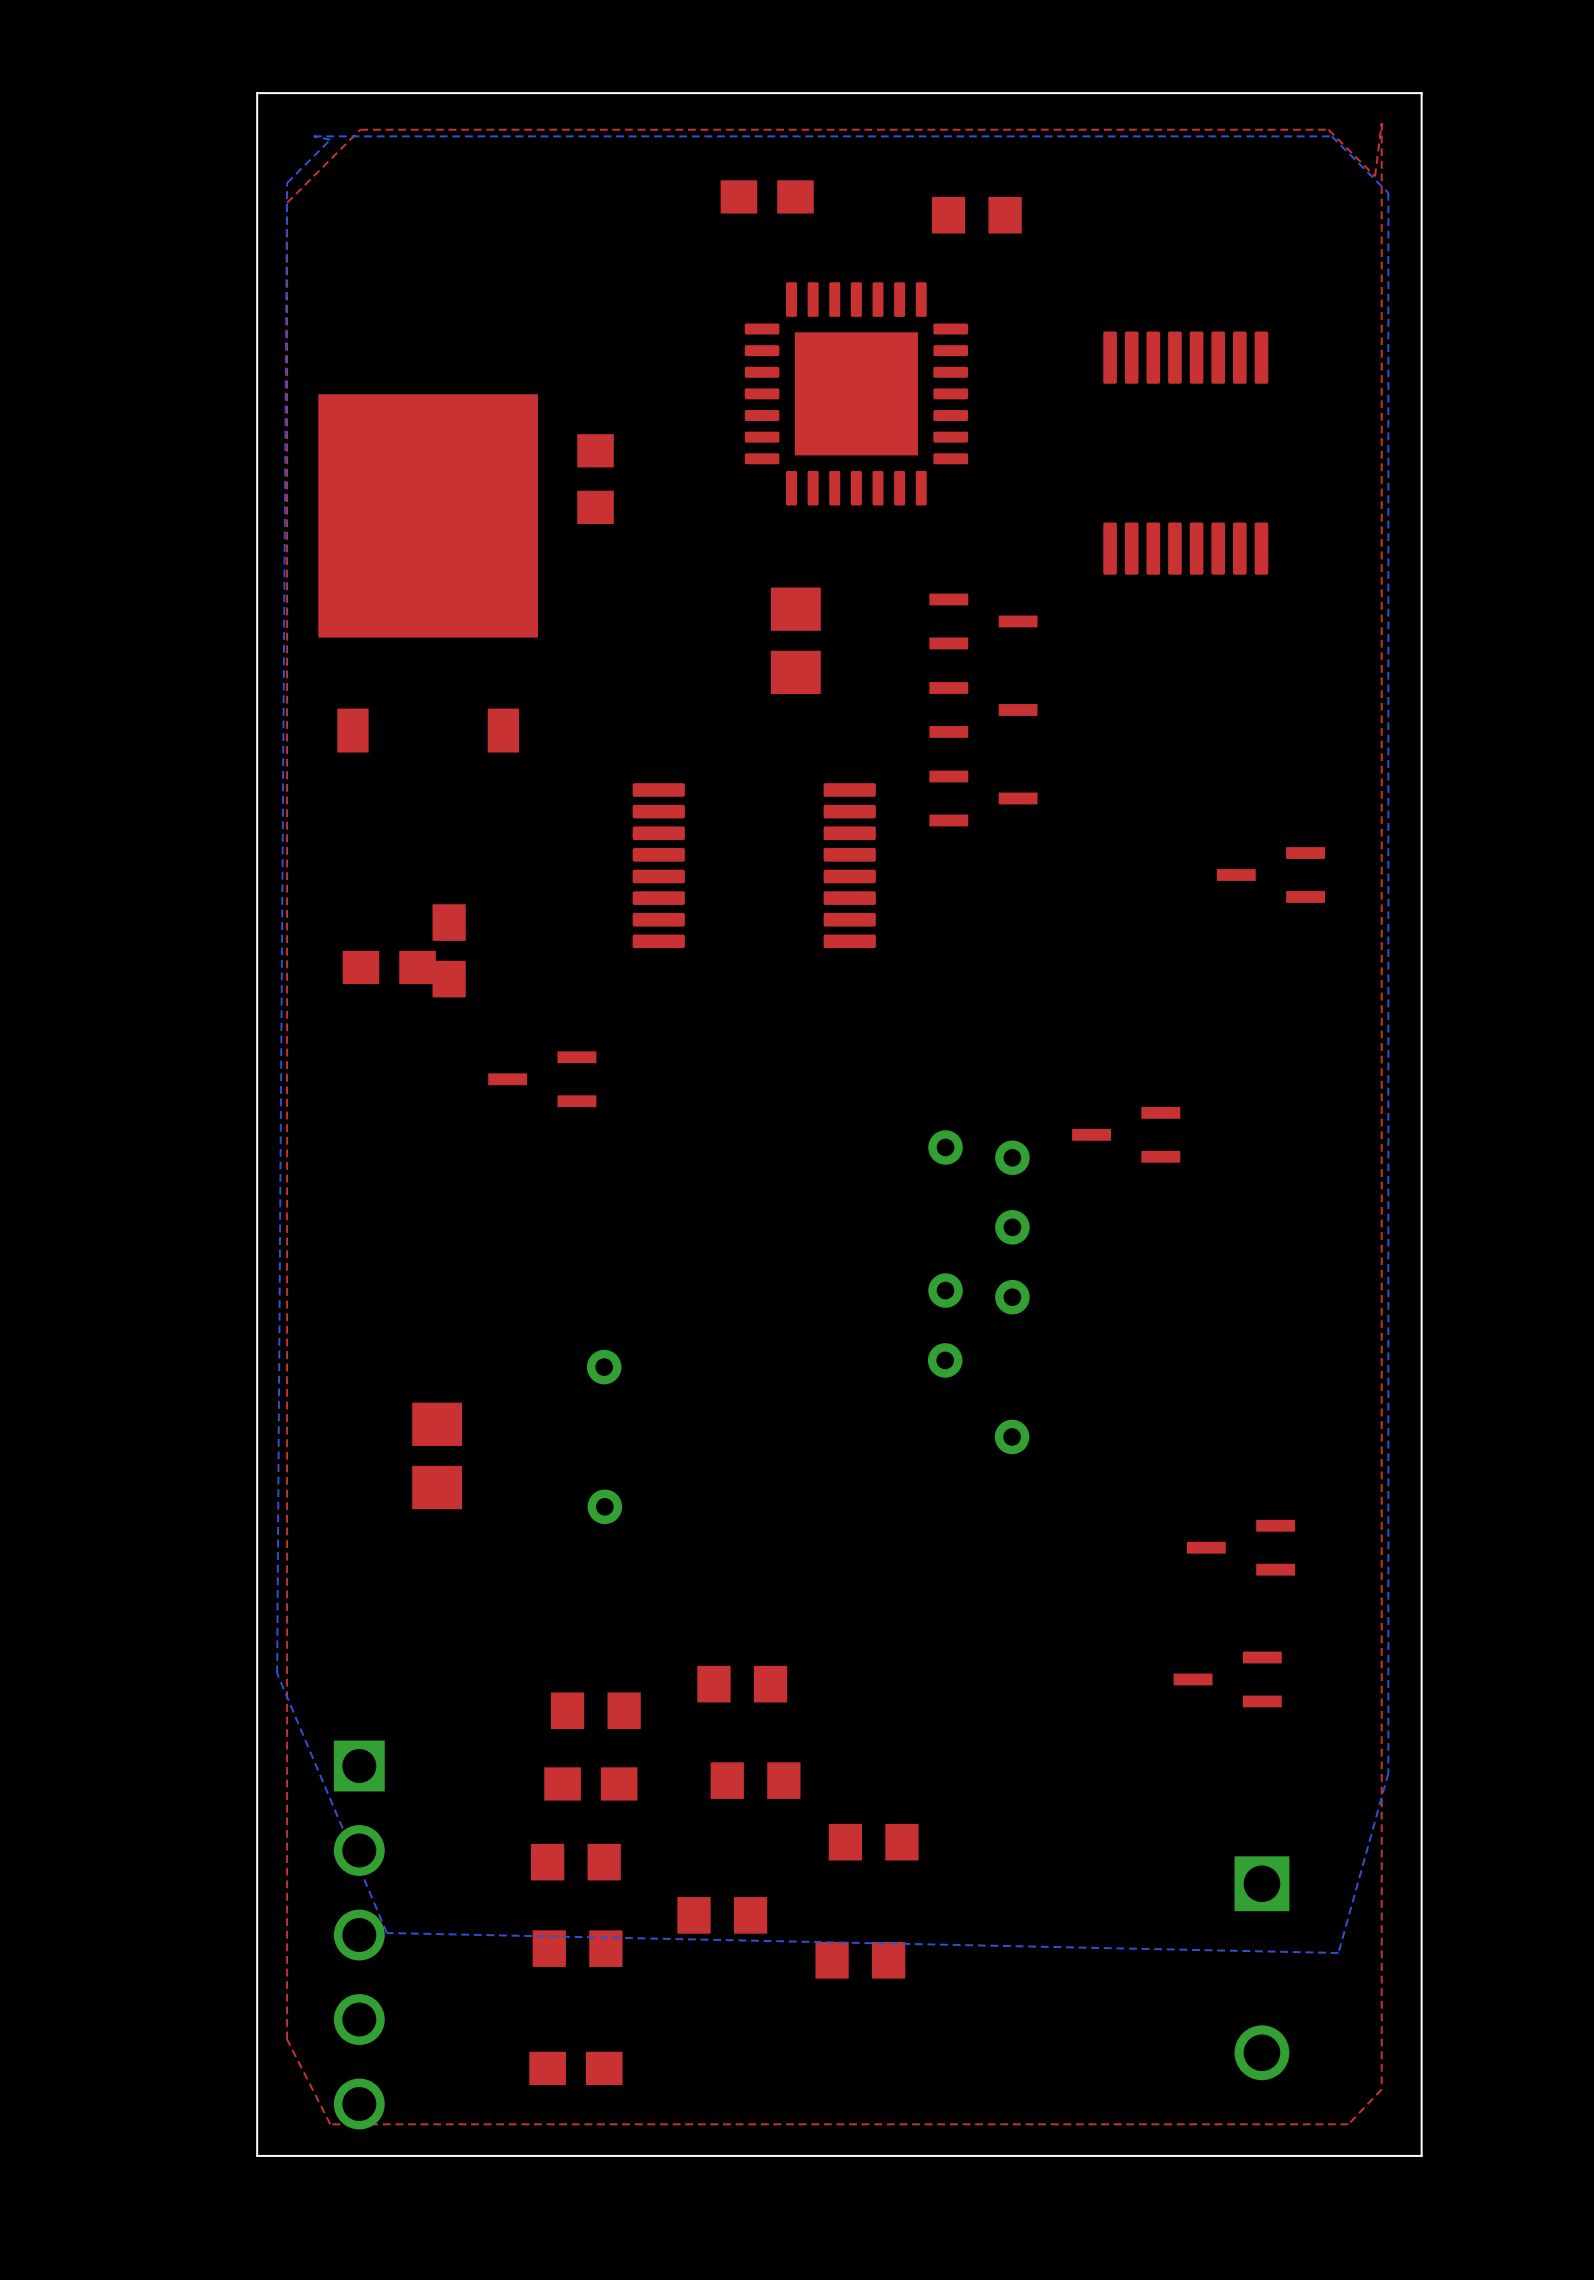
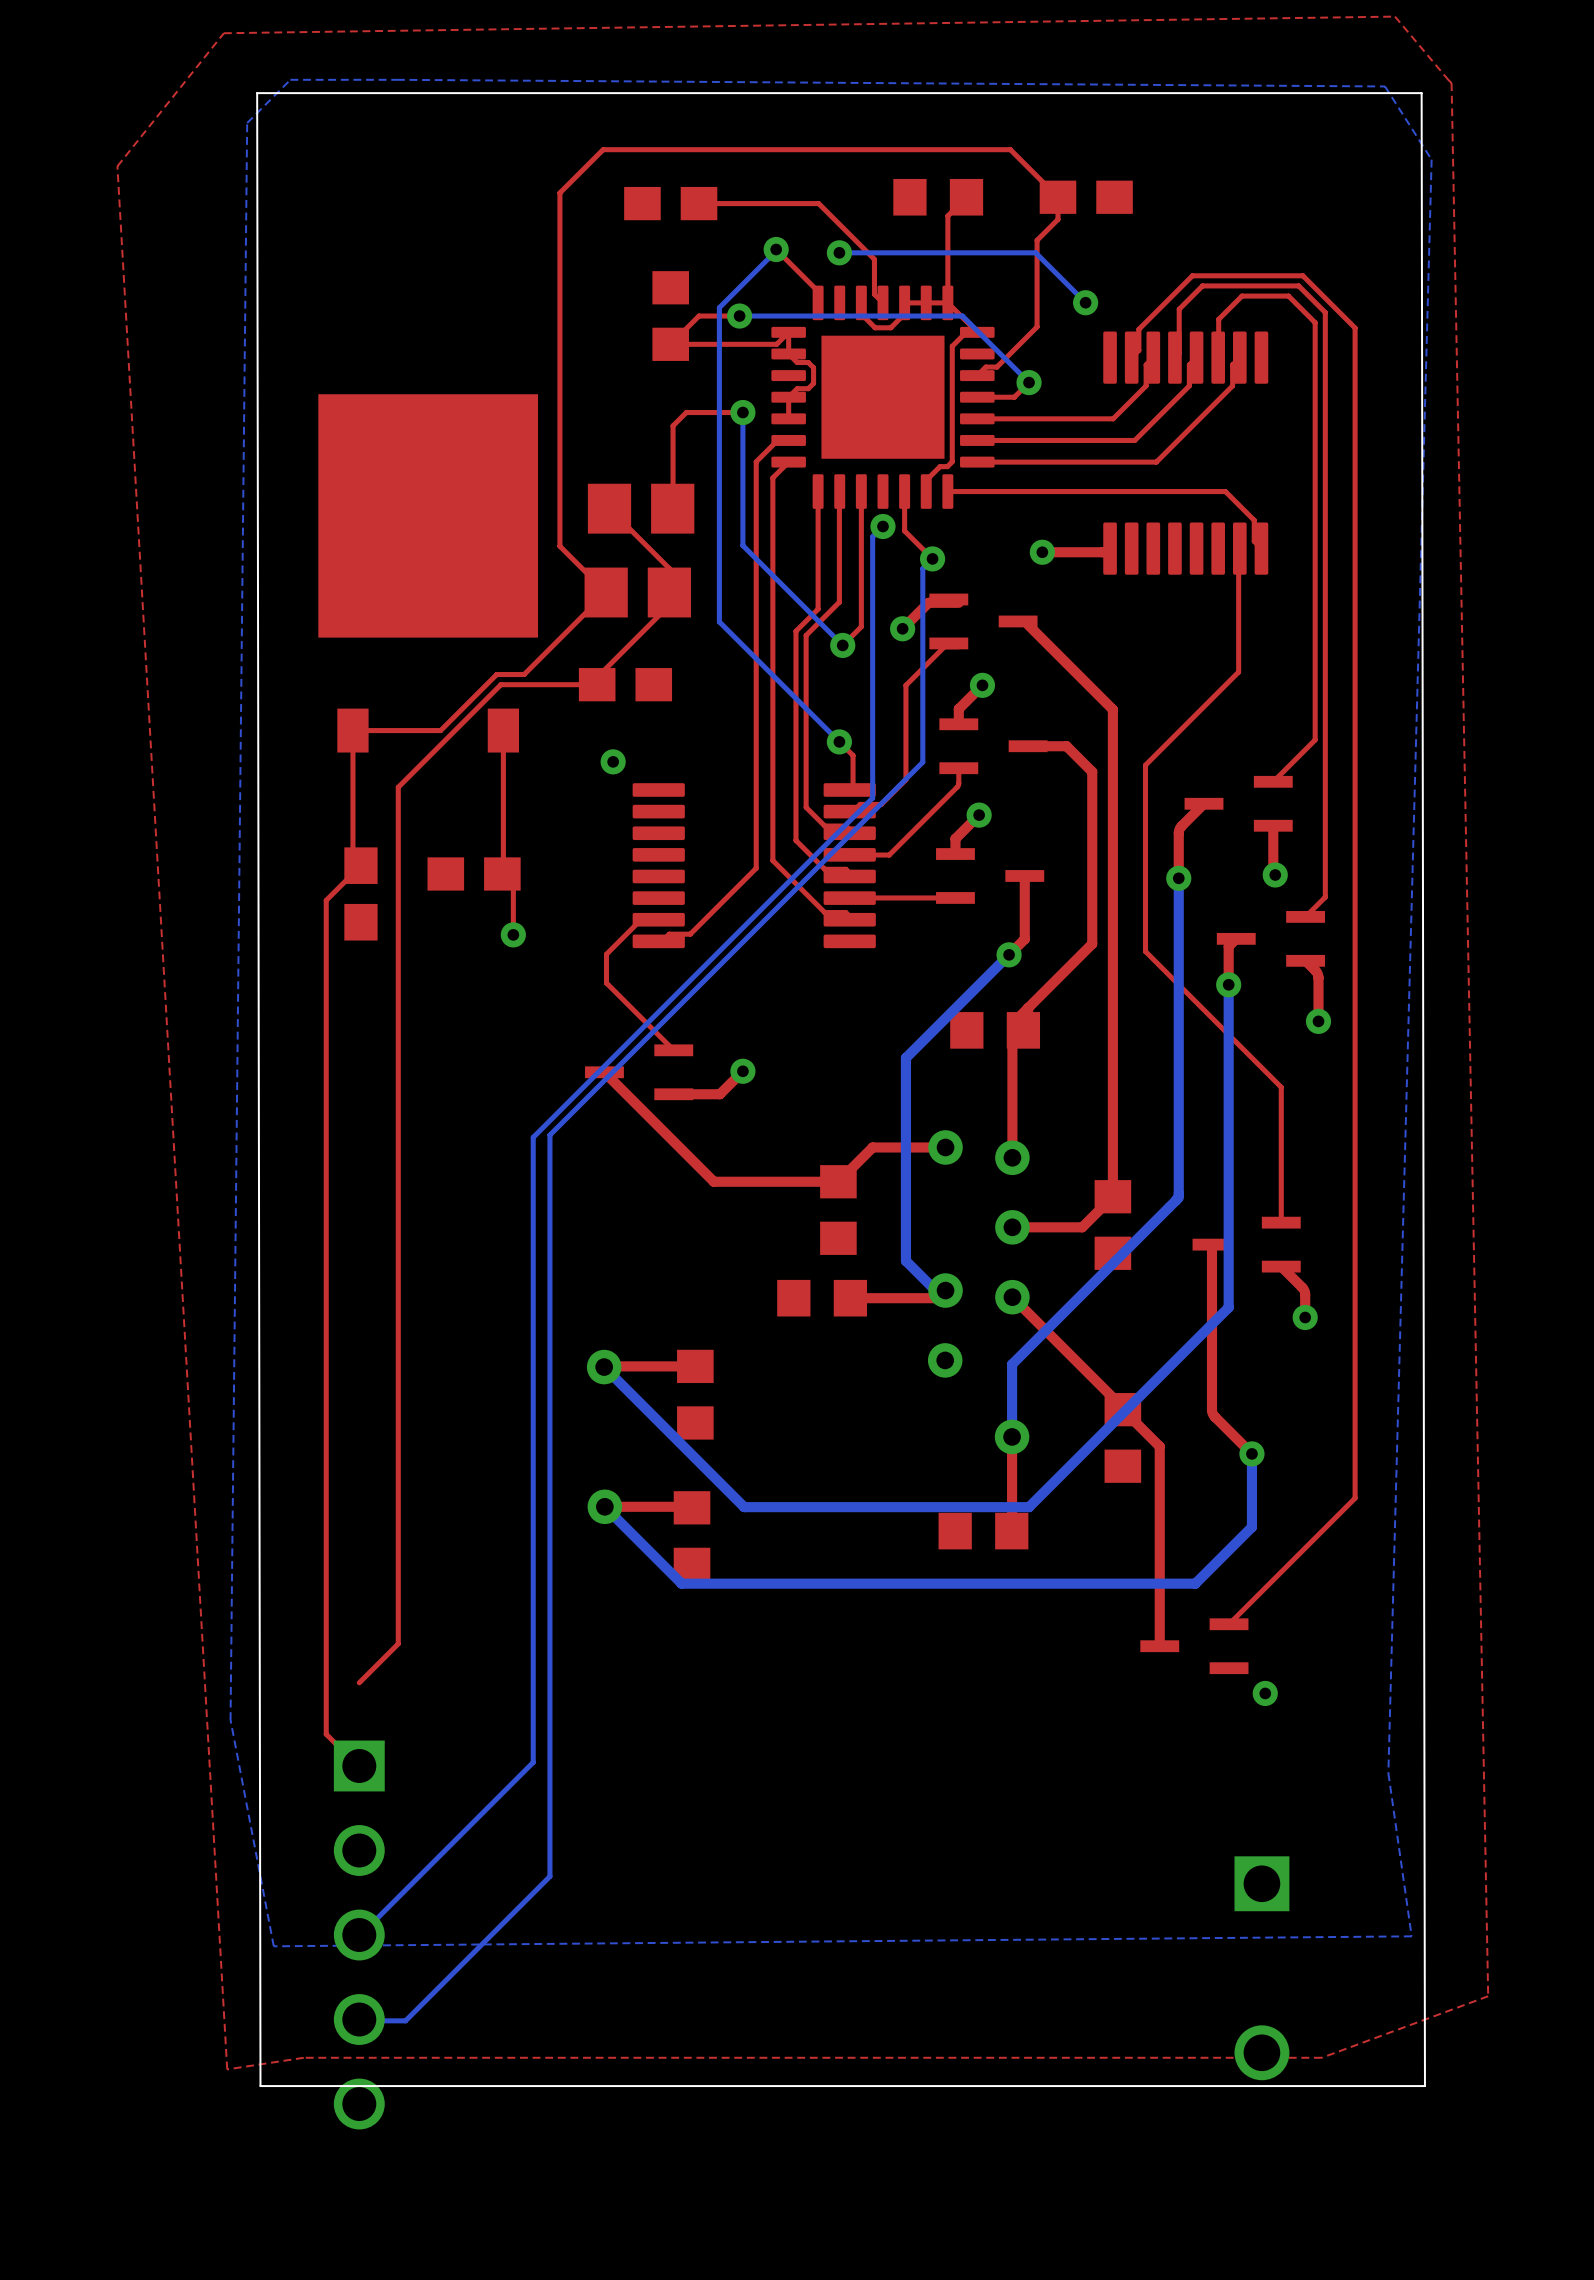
board edge: (1421, 93) (1421, 2155) (257, 2155) (257, 93) -> (1421, 93) (1424, 2086) (260, 2086) (257, 93)
top zone outline: (1381, 123) (1381, 2089) (1348, 2124) (330, 2124) (287, 2039) (287, 202) (360, 129) (1328, 129) (1375, 176) (1381, 123) -> (1395, 16) (1451, 83) (1488, 1996) (1321, 2057) (303, 2057) (227, 2069) (117, 166) (223, 33) (1395, 16)
bottom zone outline: (1331, 136) (313, 136) (330, 139) (287, 182) (277, 1673) (386, 1933) (1338, 1952) (1388, 1773) (1388, 192) (1331, 136) -> (396, 79) (1385, 86) (1431, 159) (1388, 1773) (1411, 1936) (273, 1946) (230, 1720) (247, 123) (290, 79) (396, 79)
part position: (767, 196) -> (670, 203)
top track: none -> (966, 197) (947, 215) (947, 302)
top track: none -> (1057, 197) (1057, 219) (1037, 240) (1037, 326) (996, 367) (985, 367) (977, 375)
top track: none -> (1057, 197) (1010, 149) (603, 149) (559, 192) (559, 546) (606, 592) (524, 674) (496, 674) (440, 730) (352, 730) (352, 857) (360, 865) (326, 900) (326, 1734) (359, 1767)
part: none -> (1086, 197)
top track: none -> (699, 203) (818, 203) (874, 259) (874, 294) (882, 302)
part position: (976, 215) -> (938, 197)
top track: none -> (776, 249) (818, 291) (818, 302)
bottom track: none -> (776, 249) (719, 307) (719, 621) (839, 741)
via: none -> (776, 249)
bottom track: none -> (839, 252) (1035, 252) (1085, 302)
via: none -> (839, 252)
top track: none -> (947, 302) (977, 332) (966, 332) (952, 346) (952, 461) (947, 466) (940, 466) (926, 480) (926, 491)
top track: none -> (947, 302) (904, 302) (904, 314) (890, 327) (875, 327) (861, 314) (861, 302)
via: none -> (1085, 302)
part: none -> (670, 316)
top track: none -> (739, 316) (699, 316) (670, 344) (776, 344) (788, 332) (788, 353) (797, 362) (808, 362) (813, 367) (813, 383) (808, 388) (797, 388) (788, 397) (788, 418)
bottom track: none -> (739, 316) (962, 316) (1029, 382)
via: none -> (739, 316)
top track: none -> (1131, 357) (1138, 350) (1138, 329) (1192, 275) (1302, 275) (1355, 327) (1355, 1498) (1229, 1624)
top track: none -> (1153, 357) (1146, 364) (1146, 385) (1113, 418) (977, 418)
top track: none -> (1174, 357) (1179, 353) (1179, 309) (1202, 285) (1298, 285) (1325, 312) (1325, 897) (1305, 916)
top track: none -> (1196, 357) (1189, 364) (1189, 385) (1134, 440) (977, 440)
top track: none -> (1218, 357) (1218, 319) (1241, 296) (1288, 296) (1315, 322) (1315, 739) (1273, 781)
top track: none -> (1239, 357) (1232, 364) (1232, 385) (1156, 462) (977, 462)
top track: none -> (1029, 382) (1014, 397) (977, 397)
via: none -> (1029, 382)
part position: (856, 393) -> (882, 397)
top track: none -> (742, 412) (686, 412) (673, 425) (673, 508)
bottom track: none -> (742, 412) (742, 545) (842, 645)
via: none -> (742, 412)
top track: none -> (788, 440) (777, 440) (756, 461) (756, 868) (690, 934) (669, 934) (662, 941)
top track: none -> (788, 462) (772, 477) (772, 860) (824, 912) (845, 912) (853, 919)
part: (595, 479) -> none
top track: none -> (818, 491) (818, 609) (795, 631) (795, 840) (824, 869) (845, 869) (853, 876)
top track: none -> (839, 491) (839, 602) (806, 635) (806, 807) (824, 826) (845, 826) (853, 833)
top track: none -> (861, 491) (861, 626) (842, 645)
top track: none -> (904, 491) (904, 530) (932, 558)
top track: none -> (947, 491) (1225, 491) (1254, 520) (1254, 541) (1261, 548)
top track: none -> (609, 508) (669, 568) (669, 605) (589, 684)
part: none -> (641, 508)
bottom track: none -> (882, 526) (872, 536) (872, 797) (533, 1137) (533, 1762) (359, 1936)
via: none -> (882, 526)
top track: none -> (1110, 548) (1103, 552) (1042, 552)
top track: none -> (1239, 548) (1238, 672) (1145, 765) (1145, 951) (1281, 1087) (1281, 1222)
via: none -> (1042, 552)
bottom track: none -> (932, 558) (922, 568) (922, 762) (549, 1135) (549, 1876) (405, 2020) (359, 2020)
via: none -> (932, 558)
part: none -> (637, 592)
top track: none -> (958, 602) (928, 602) (902, 628)
top track: none -> (1028, 624) (1112, 709) (1112, 1196) (1082, 1227) (1012, 1227)
via: none -> (902, 628)
part: (795, 640) -> none
via: none -> (842, 645)
top track: none -> (958, 646) (944, 646) (905, 685) (905, 779) (881, 804) (860, 804) (853, 811)
top track: none -> (597, 684) (500, 684) (398, 787) (398, 1643) (359, 1682)
part: none -> (625, 684)
top track: none -> (982, 685) (958, 709) (958, 724)
via: none -> (982, 685)
part: (983, 709) -> none
top track: none -> (503, 730) (502, 873) (513, 884) (513, 934)
top track: none -> (839, 741) (853, 755) (853, 789)
via: none -> (839, 741)
part: none -> (993, 746)
top track: none -> (1028, 746) (1066, 746) (1092, 771) (1092, 943) (1012, 1023) (1012, 1157)
via: none -> (613, 761)
top track: none -> (958, 768) (957, 786) (889, 855) (853, 854)
part: (983, 798) -> none
top track: none -> (1204, 803) (1179, 830) (1178, 878)
part: none -> (1238, 803)
top track: none -> (979, 815) (955, 838) (955, 854)
via: none -> (979, 815)
top track: none -> (1273, 825) (1273, 870) (1275, 874)
part: none -> (474, 873)
part: (1270, 874) -> none
via: none -> (1275, 874)
part: none -> (990, 875)
top track: none -> (1024, 875) (1024, 939) (1009, 954)
bottom track: none -> (1178, 878) (1178, 1193) (1175, 1200)
via: none -> (1178, 878)
part: none -> (360, 893)
top track: none -> (955, 897) (853, 898)
top track: none -> (662, 919) (641, 919) (606, 954) (606, 983) (673, 1050)
via: none -> (513, 934)
top track: none -> (1236, 938) (1228, 946) (1228, 984)
part: none -> (1270, 938)
part: (449, 950) -> none
bottom track: none -> (1009, 954) (905, 1057) (905, 1260) (935, 1290) (945, 1290)
via: none -> (1009, 954)
top track: none -> (1305, 960) (1318, 975) (1318, 1021)
part: (389, 967) -> none
bottom track: none -> (1228, 984) (1228, 1307) (1029, 1507) (744, 1507) (604, 1367)
via: none -> (1228, 984)
via: none -> (1318, 1021)
part: none -> (995, 1030)
top track: none -> (742, 1071) (719, 1094) (673, 1094)
via: none -> (742, 1071)
top track: none -> (604, 1072) (713, 1181) (838, 1181) (872, 1147) (945, 1147)
part position: (542, 1079) -> (639, 1072)
part: (1126, 1134) -> none
bottom track: none -> (1178, 1197) (1012, 1364) (1012, 1436)
part: none -> (838, 1210)
part: none -> (1112, 1225)
top track: none -> (1211, 1244) (1212, 1411) (1214, 1416) (1251, 1453)
part: none -> (1246, 1244)
top track: none -> (1281, 1266) (1304, 1290) (1305, 1317)
top track: none -> (945, 1290) (937, 1298) (850, 1298)
top track: none -> (1012, 1297) (1159, 1446) (1159, 1646)
part: none -> (822, 1298)
via: none -> (1305, 1317)
top track: none -> (695, 1366) (604, 1367)
part: none -> (695, 1394)
top track: none -> (1012, 1436) (1012, 1530)
part: none -> (1122, 1437)
bottom track: none -> (1251, 1453) (1251, 1527) (1195, 1583) (681, 1583) (604, 1506)
via: none -> (1251, 1453)
part: (437, 1455) -> none
top track: none -> (604, 1506) (692, 1507)
part: none -> (983, 1531)
part: none -> (692, 1536)
part: (1240, 1547) -> none
part position: (1227, 1679) -> (1194, 1646)
part: (742, 1684) -> none
via: none -> (1265, 1693)
part: (595, 1710) -> none
part: (755, 1780) -> none
part: (590, 1783) -> none
part: (873, 1842) -> none
part: (575, 1862) -> none
part: (722, 1915) -> none
part: (577, 1948) -> none
part: (860, 1960) -> none
part: (575, 2068) -> none

